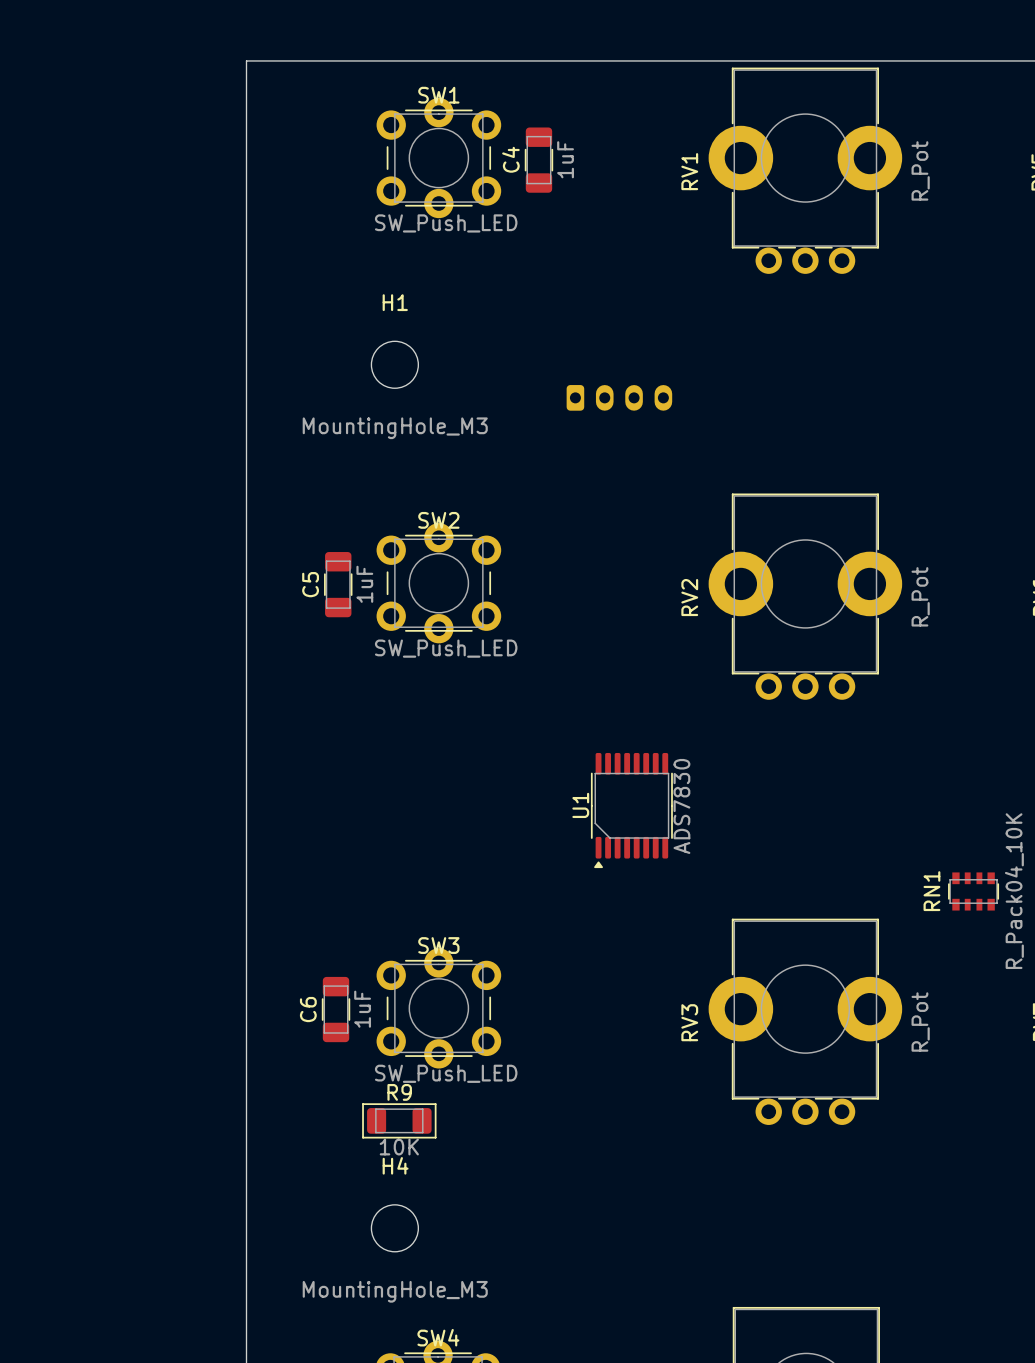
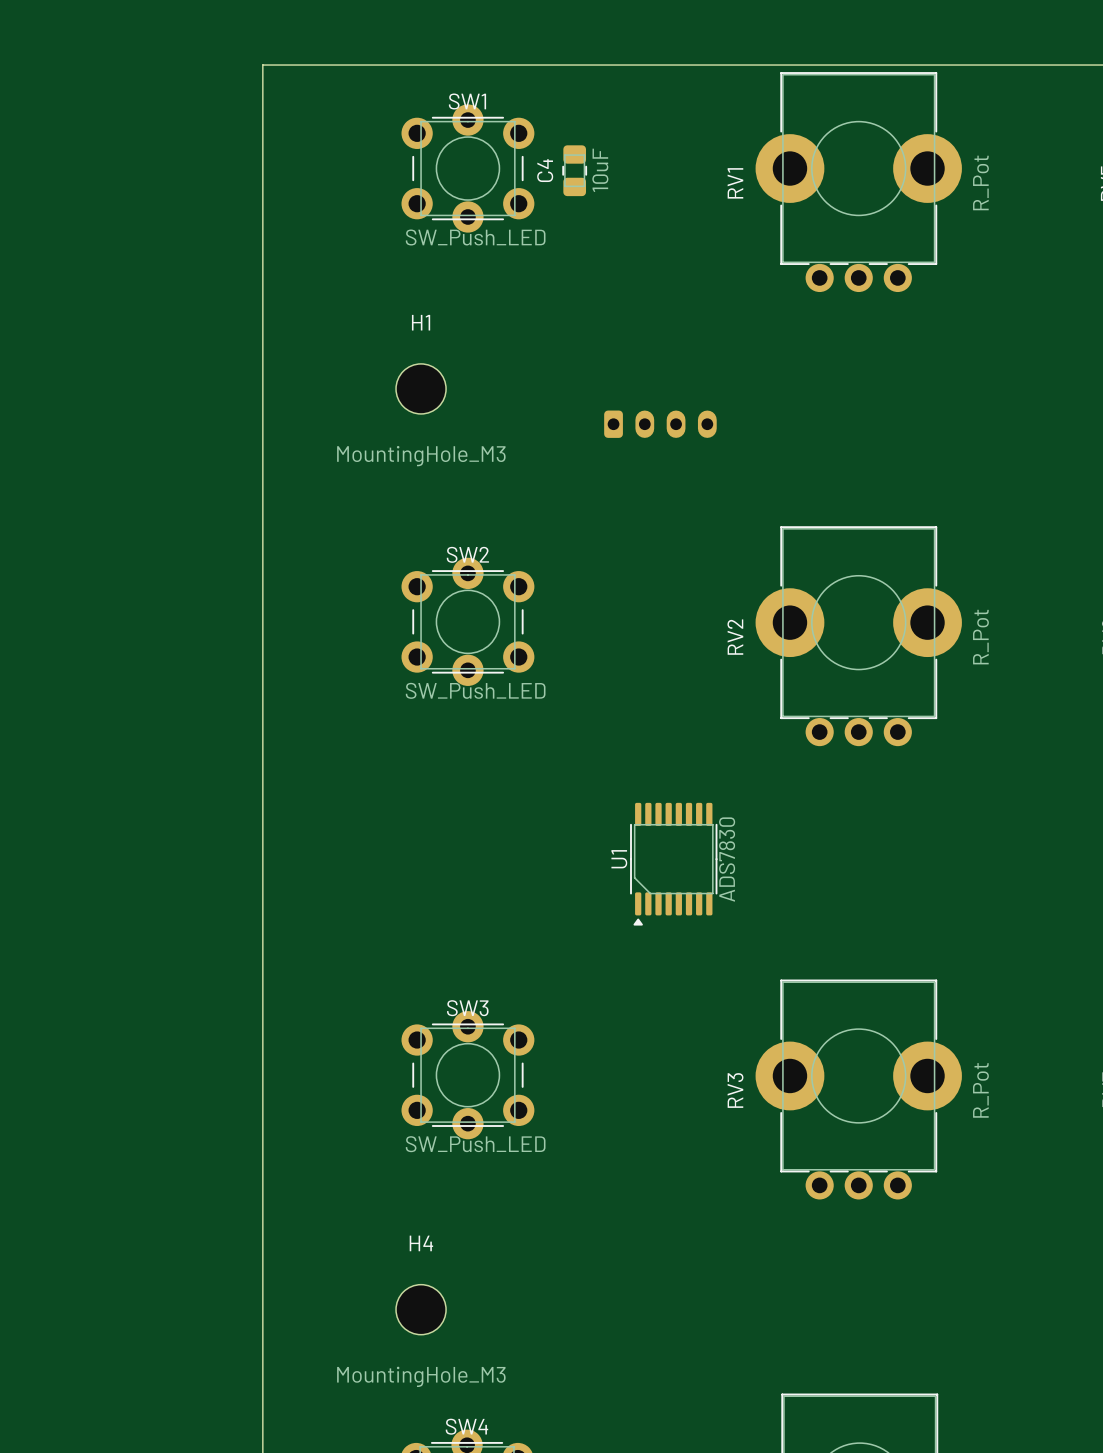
C4 footprint: [524, 127, 554, 193] -> [562, 145, 588, 197]
C4 value: 1uF (565, 159) -> 10uF (600, 170)
C5: 1uF (338, 584) -> none
RN1: R_Pack04_10K (973, 891) -> none
C6: 1uF (336, 1009) -> none
R9: 10K (399, 1120) -> none

